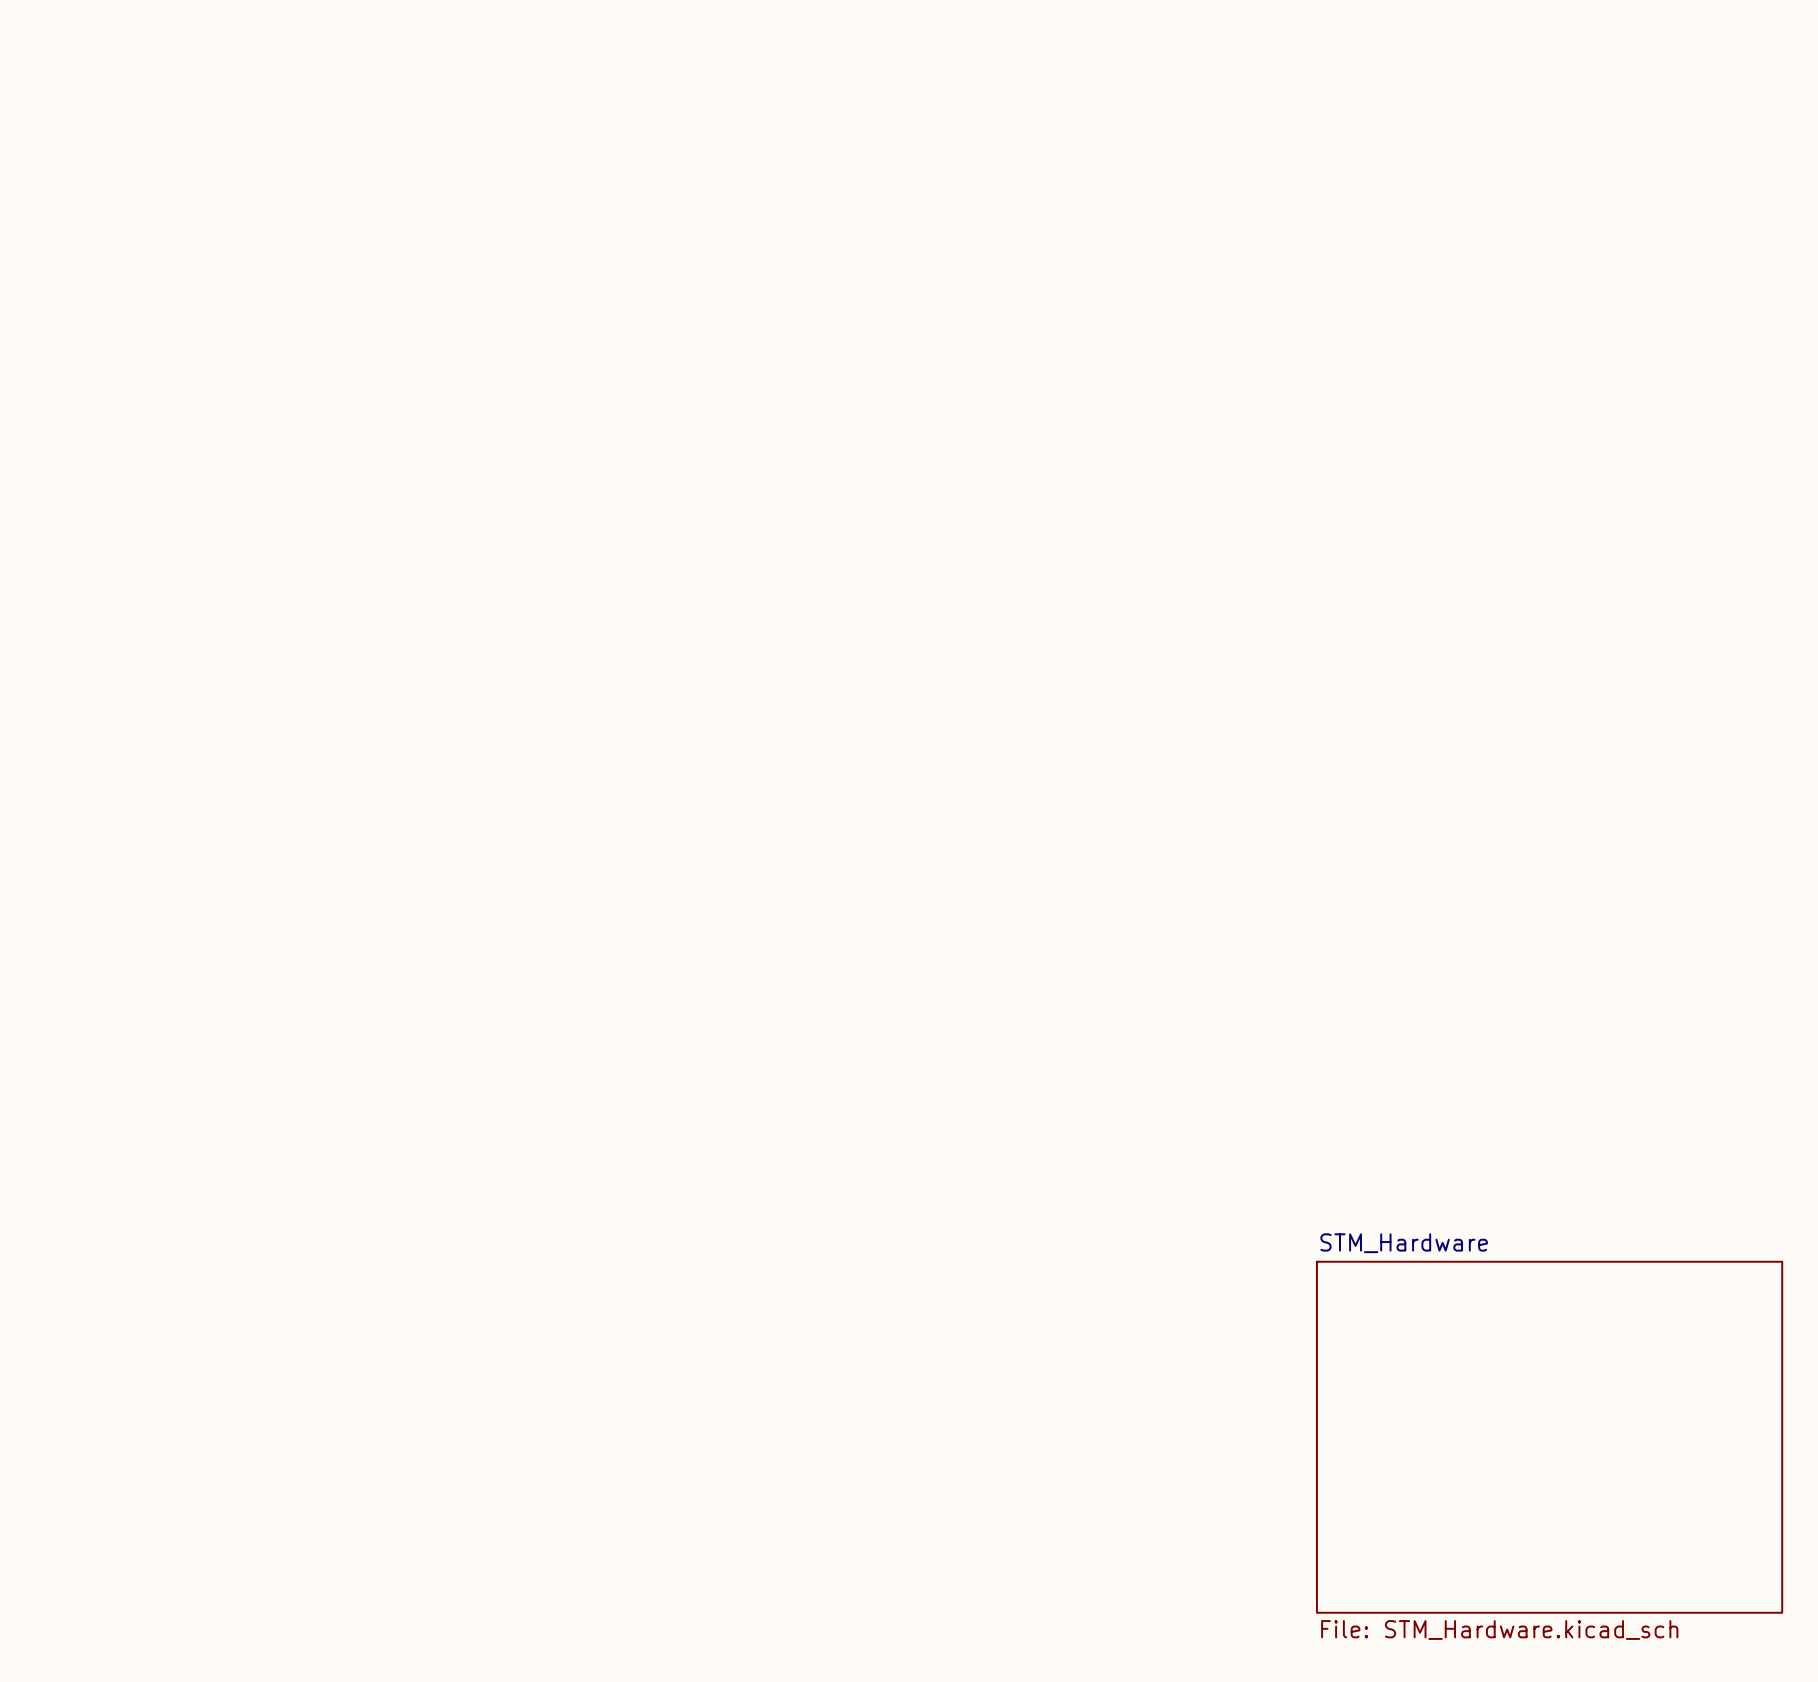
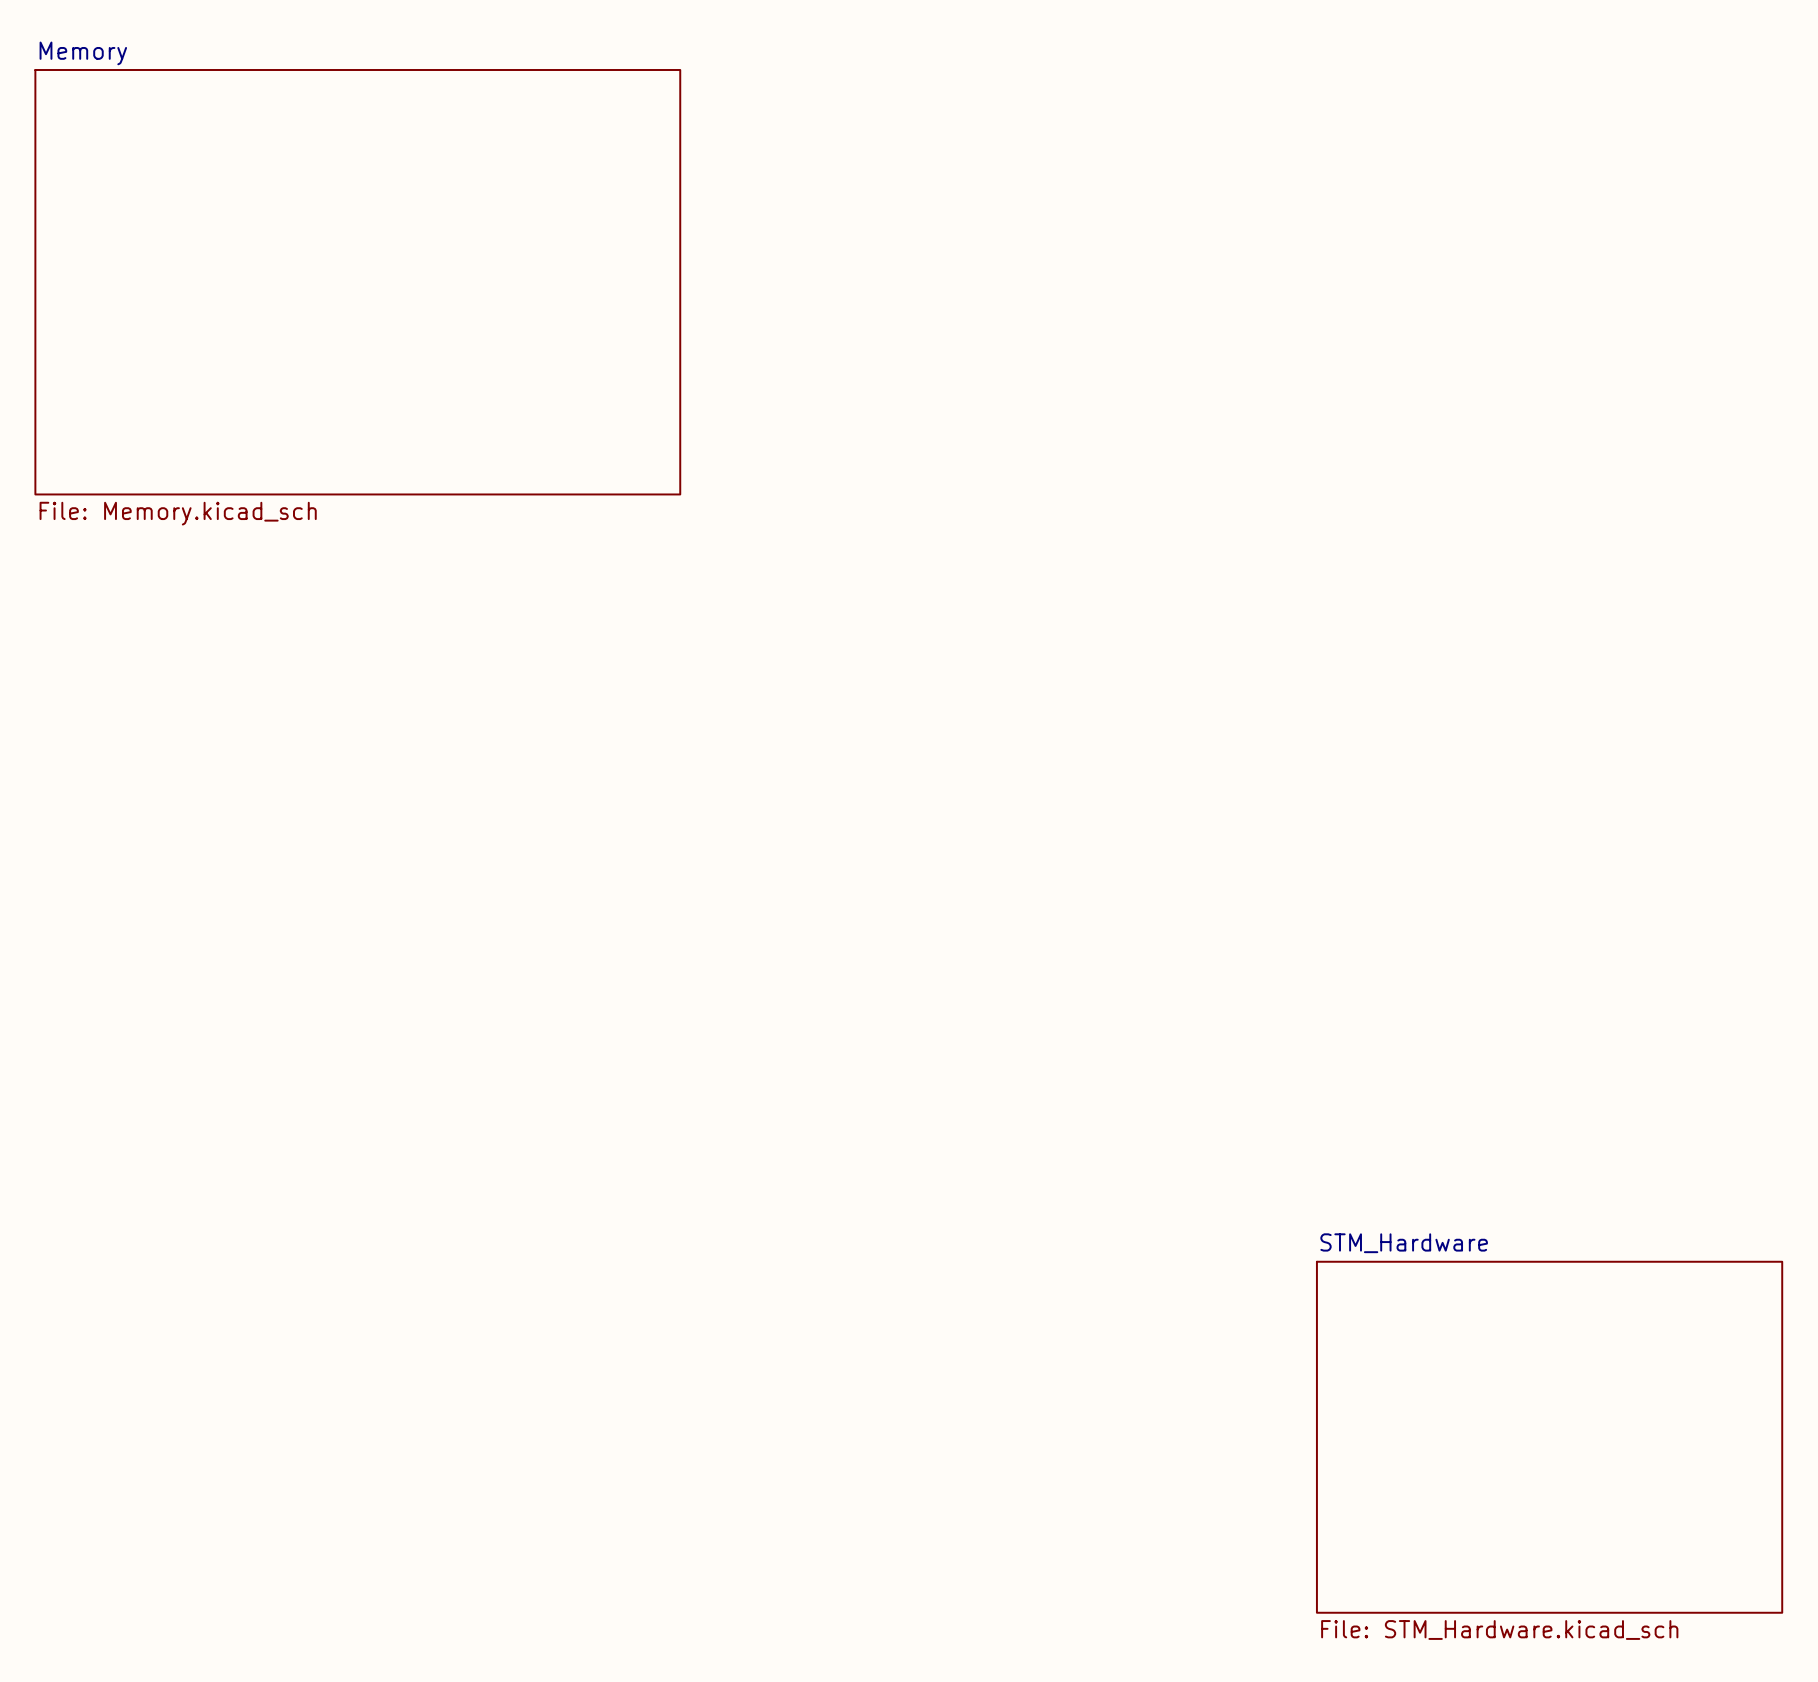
sheet Memory: none -> File: Memory.kicad_sch (357, 282)

